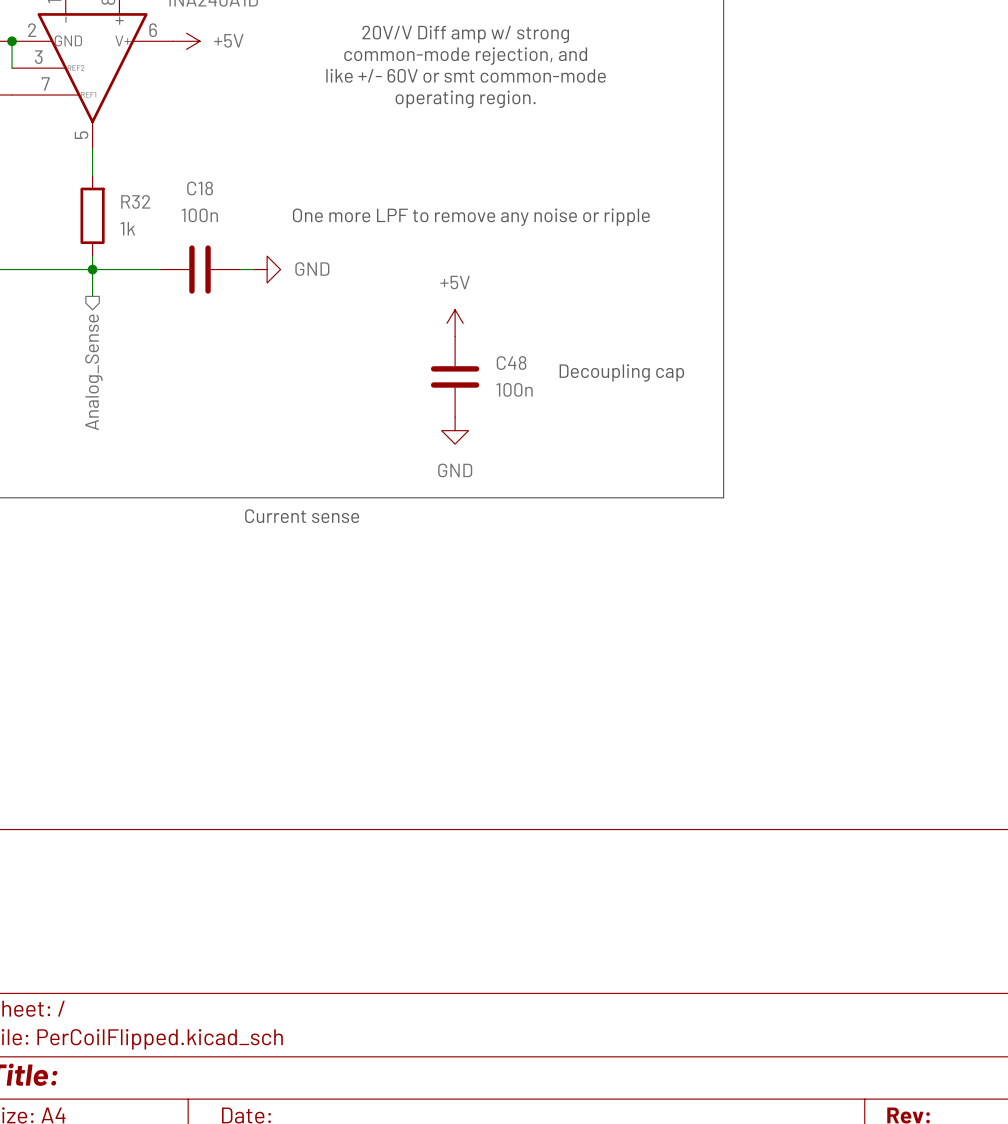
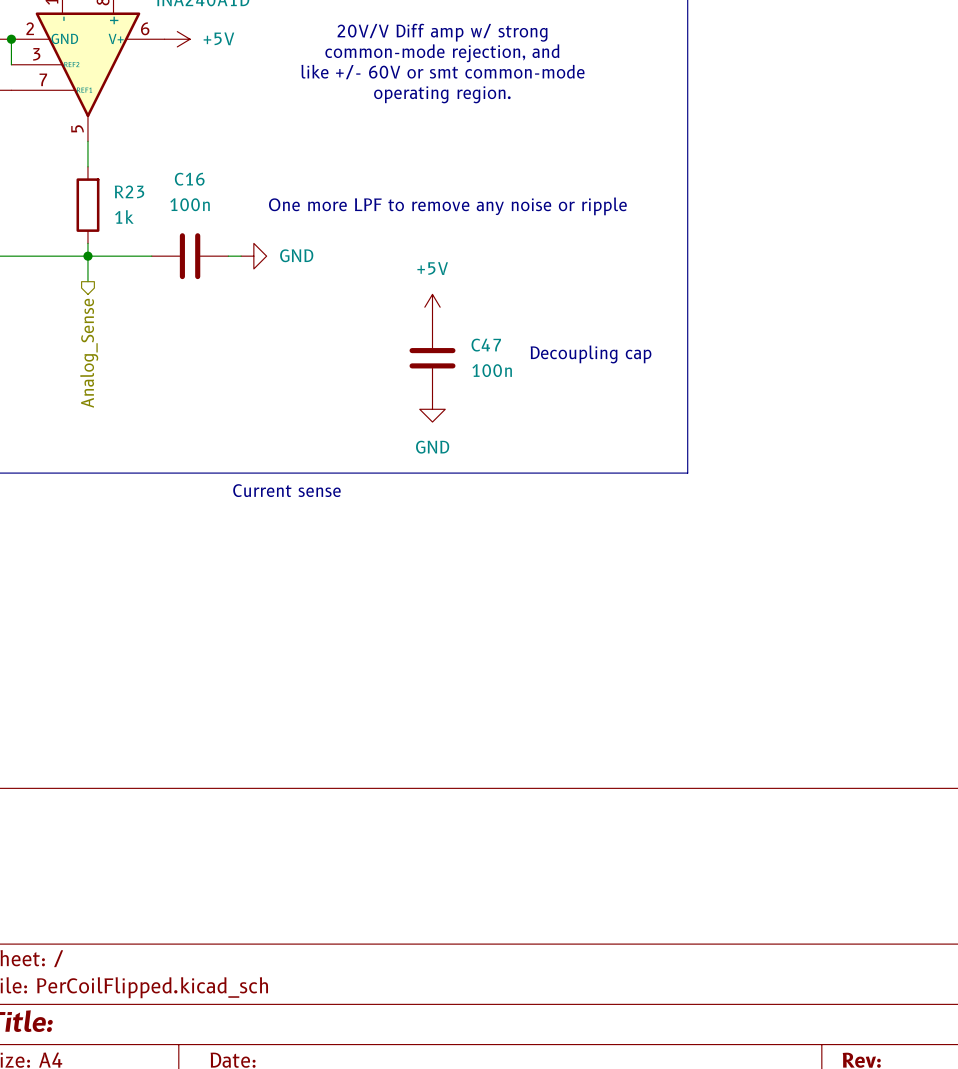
C18 name: C18 (200, 188) -> C16 (189, 179)
R32 name: R32 (135, 201) -> R23 (129, 191)
C48 name: C48 (511, 363) -> C47 (486, 345)

